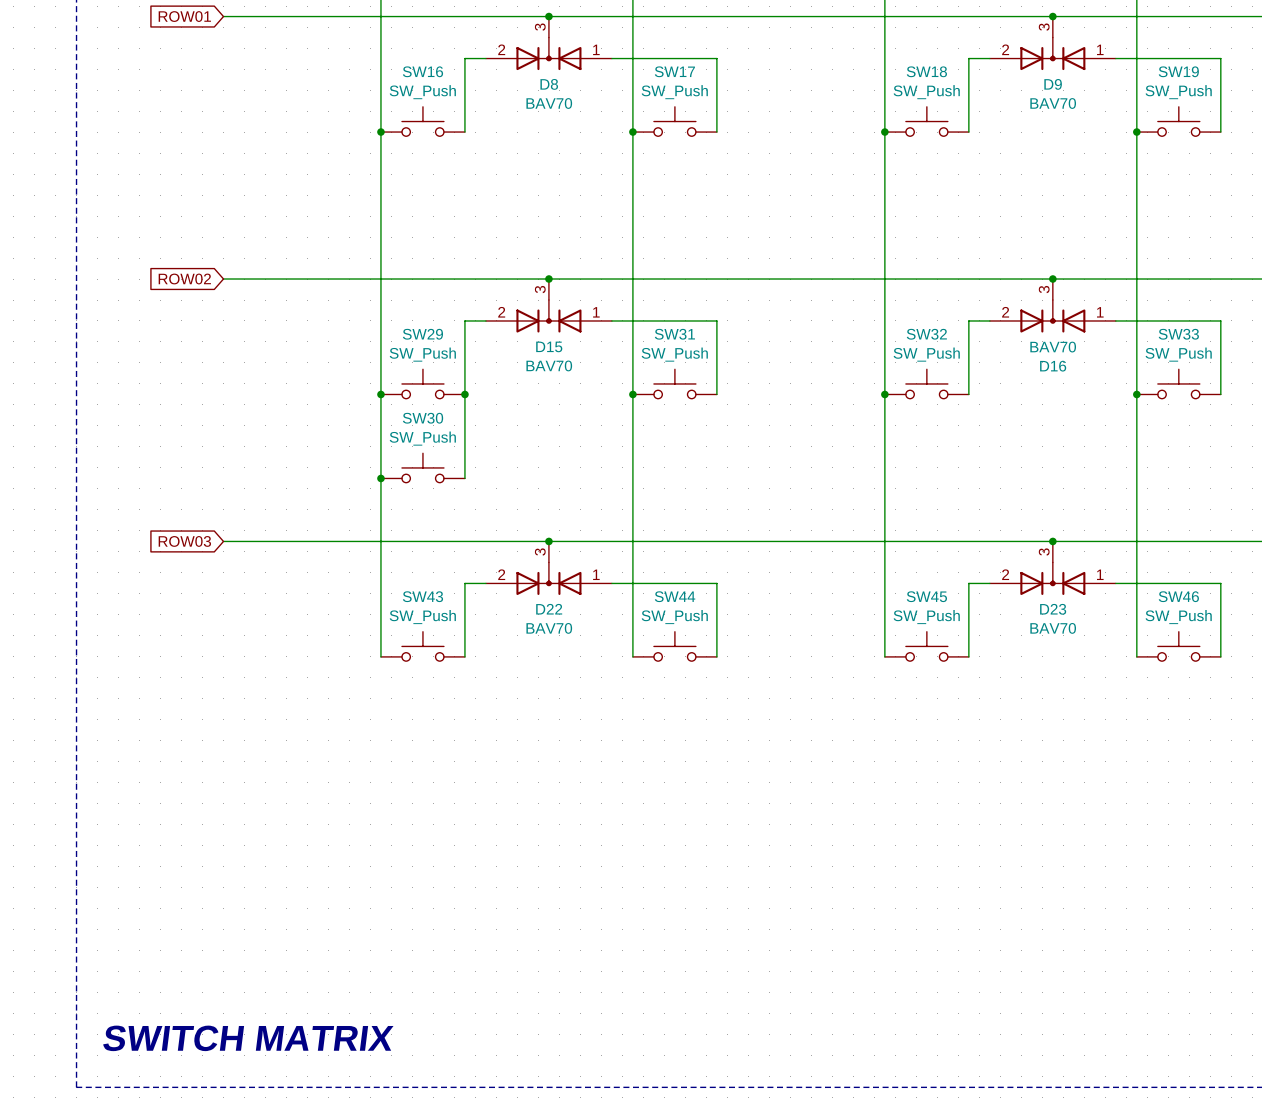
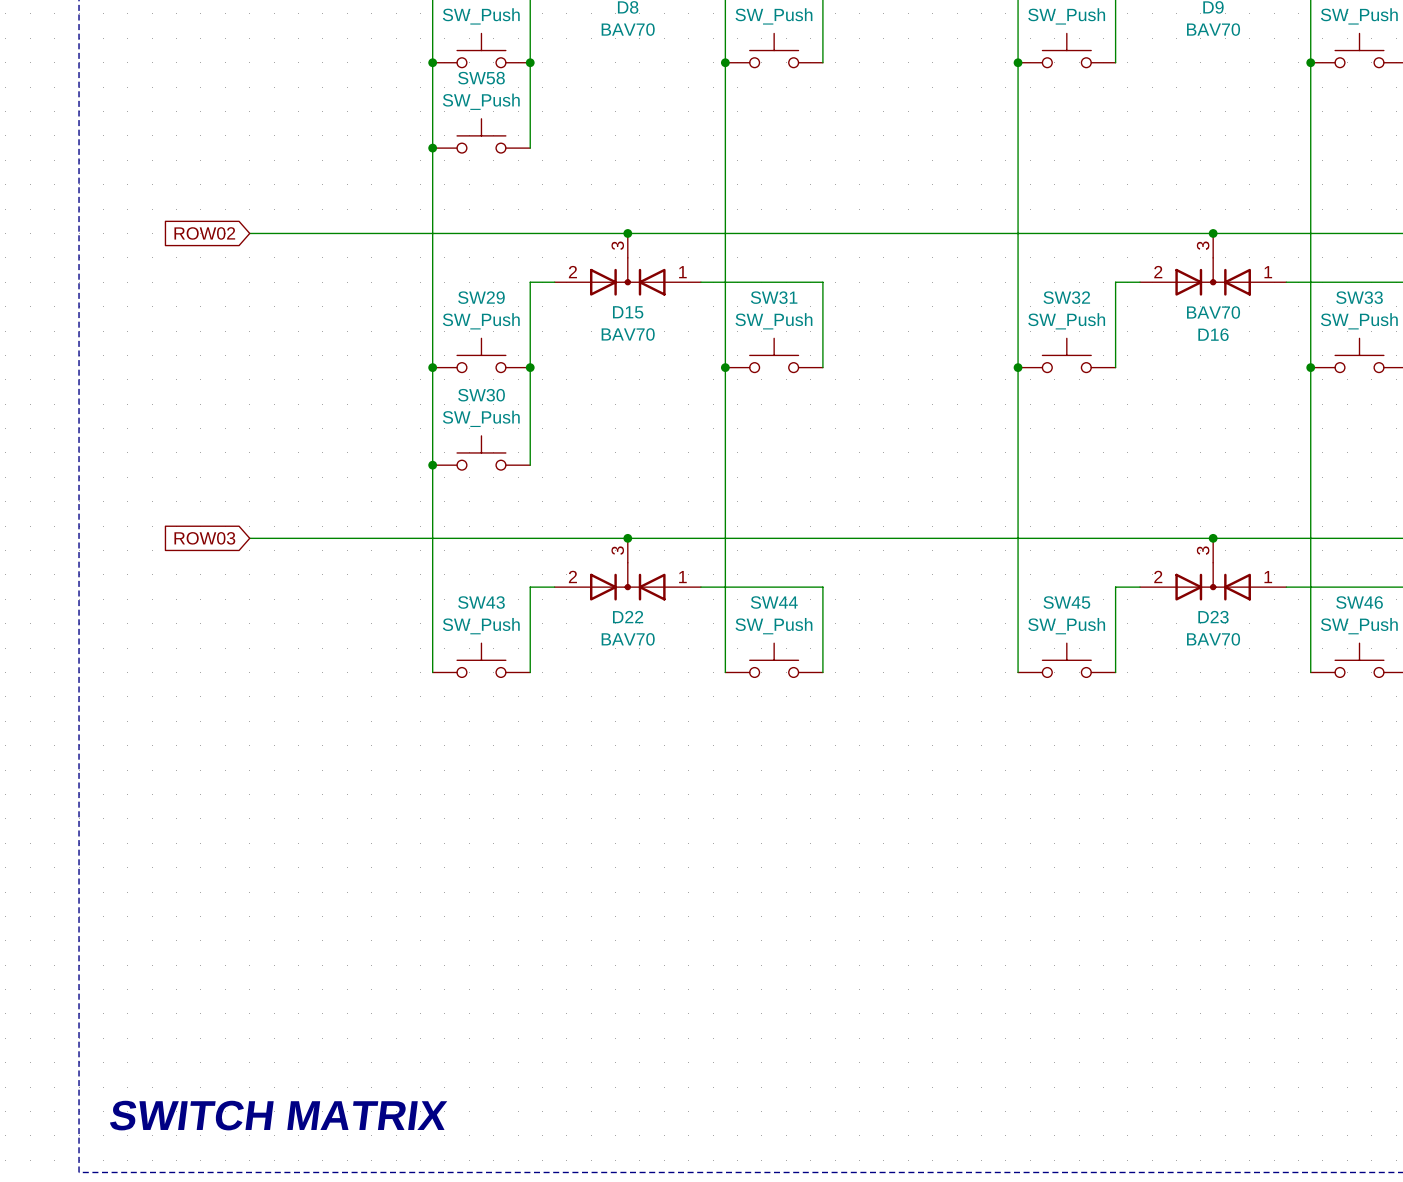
wire: none -> (530, 62) (530, 148)
junction: none -> (530, 62)
SW58: none -> SW_Push (481, 135)
junction: none -> (432, 148)

